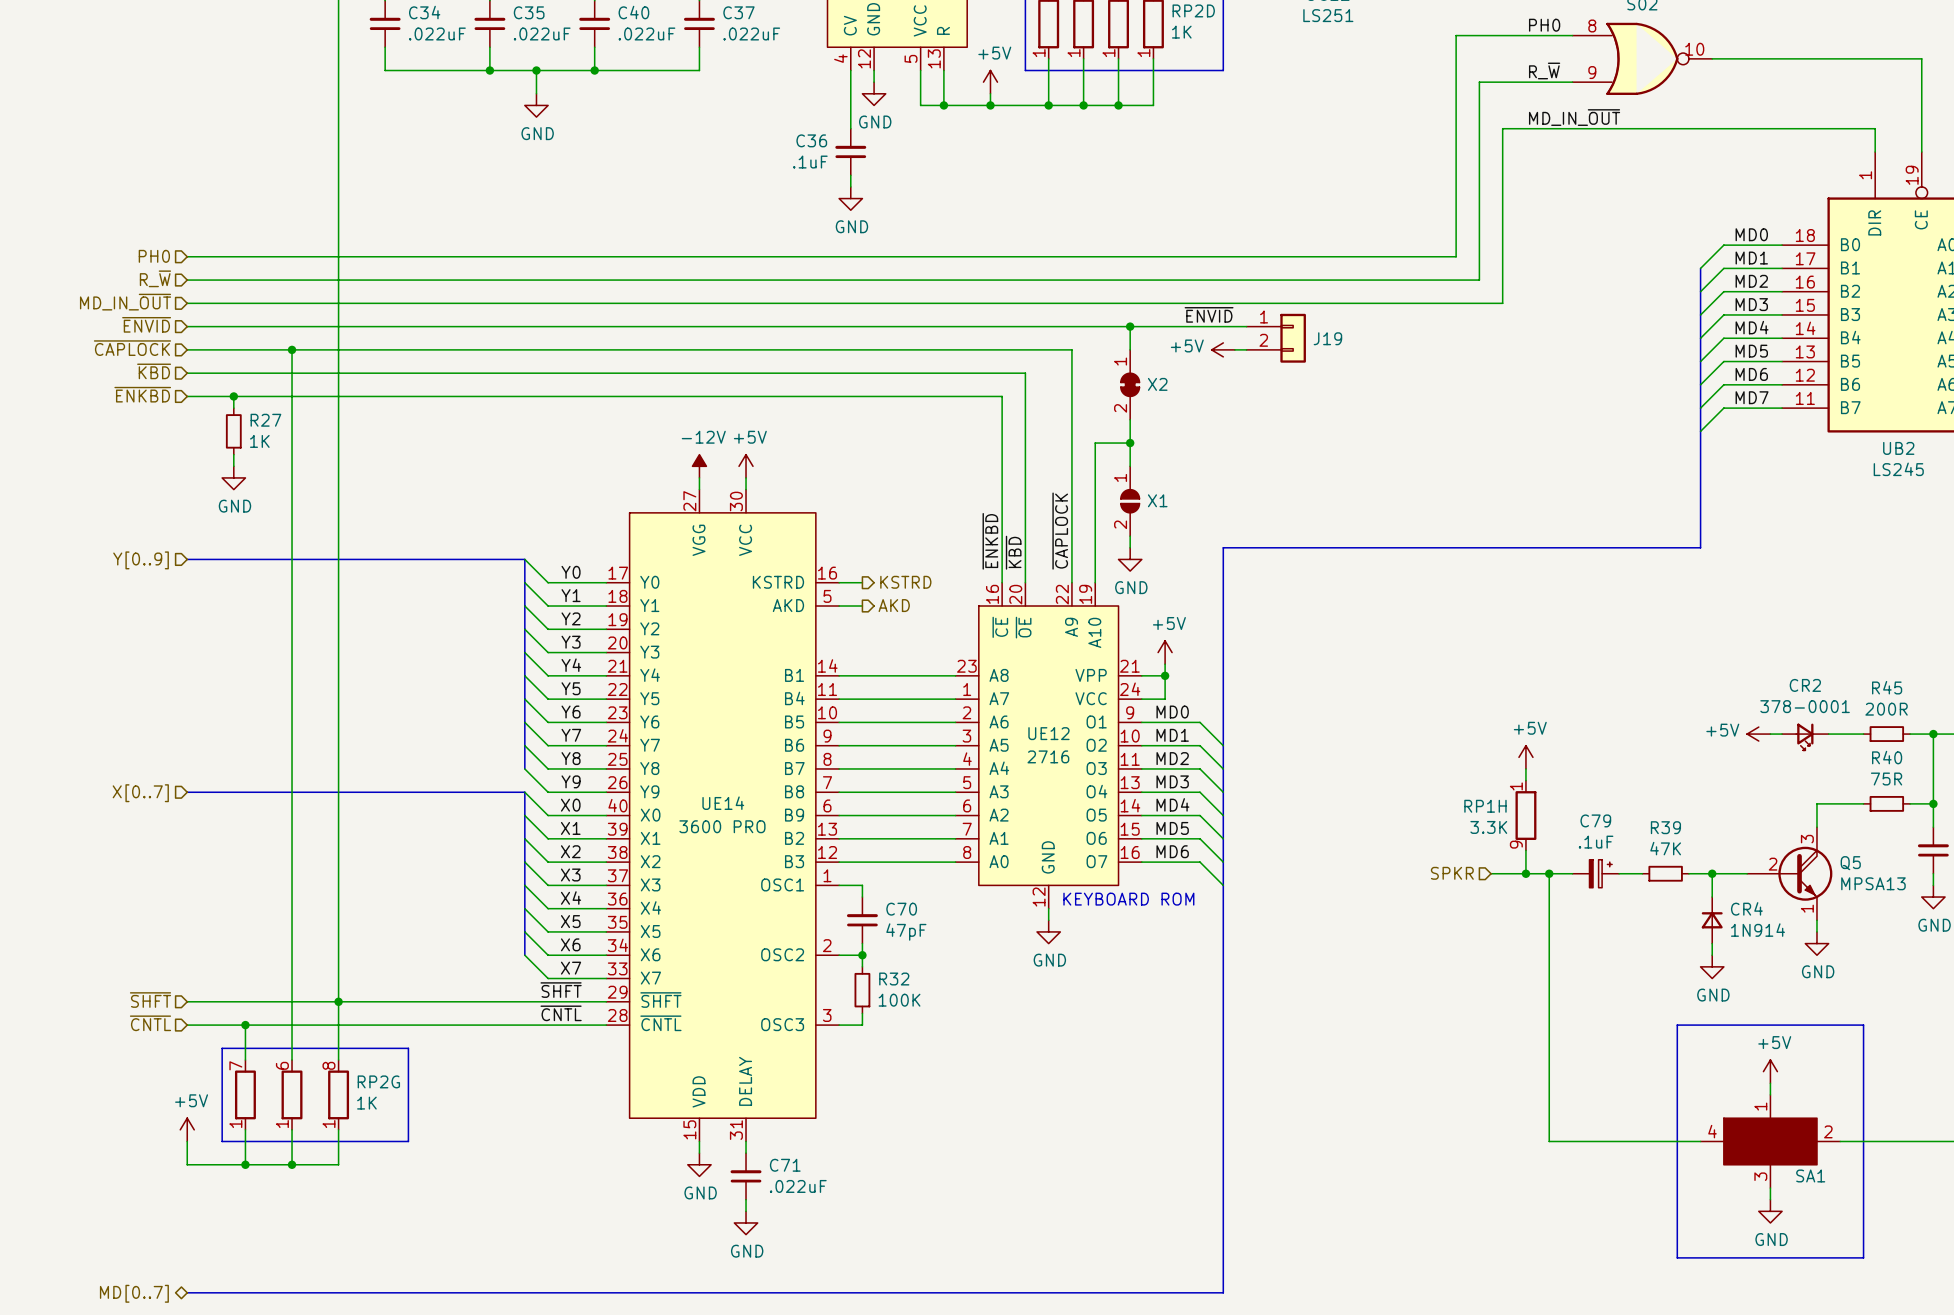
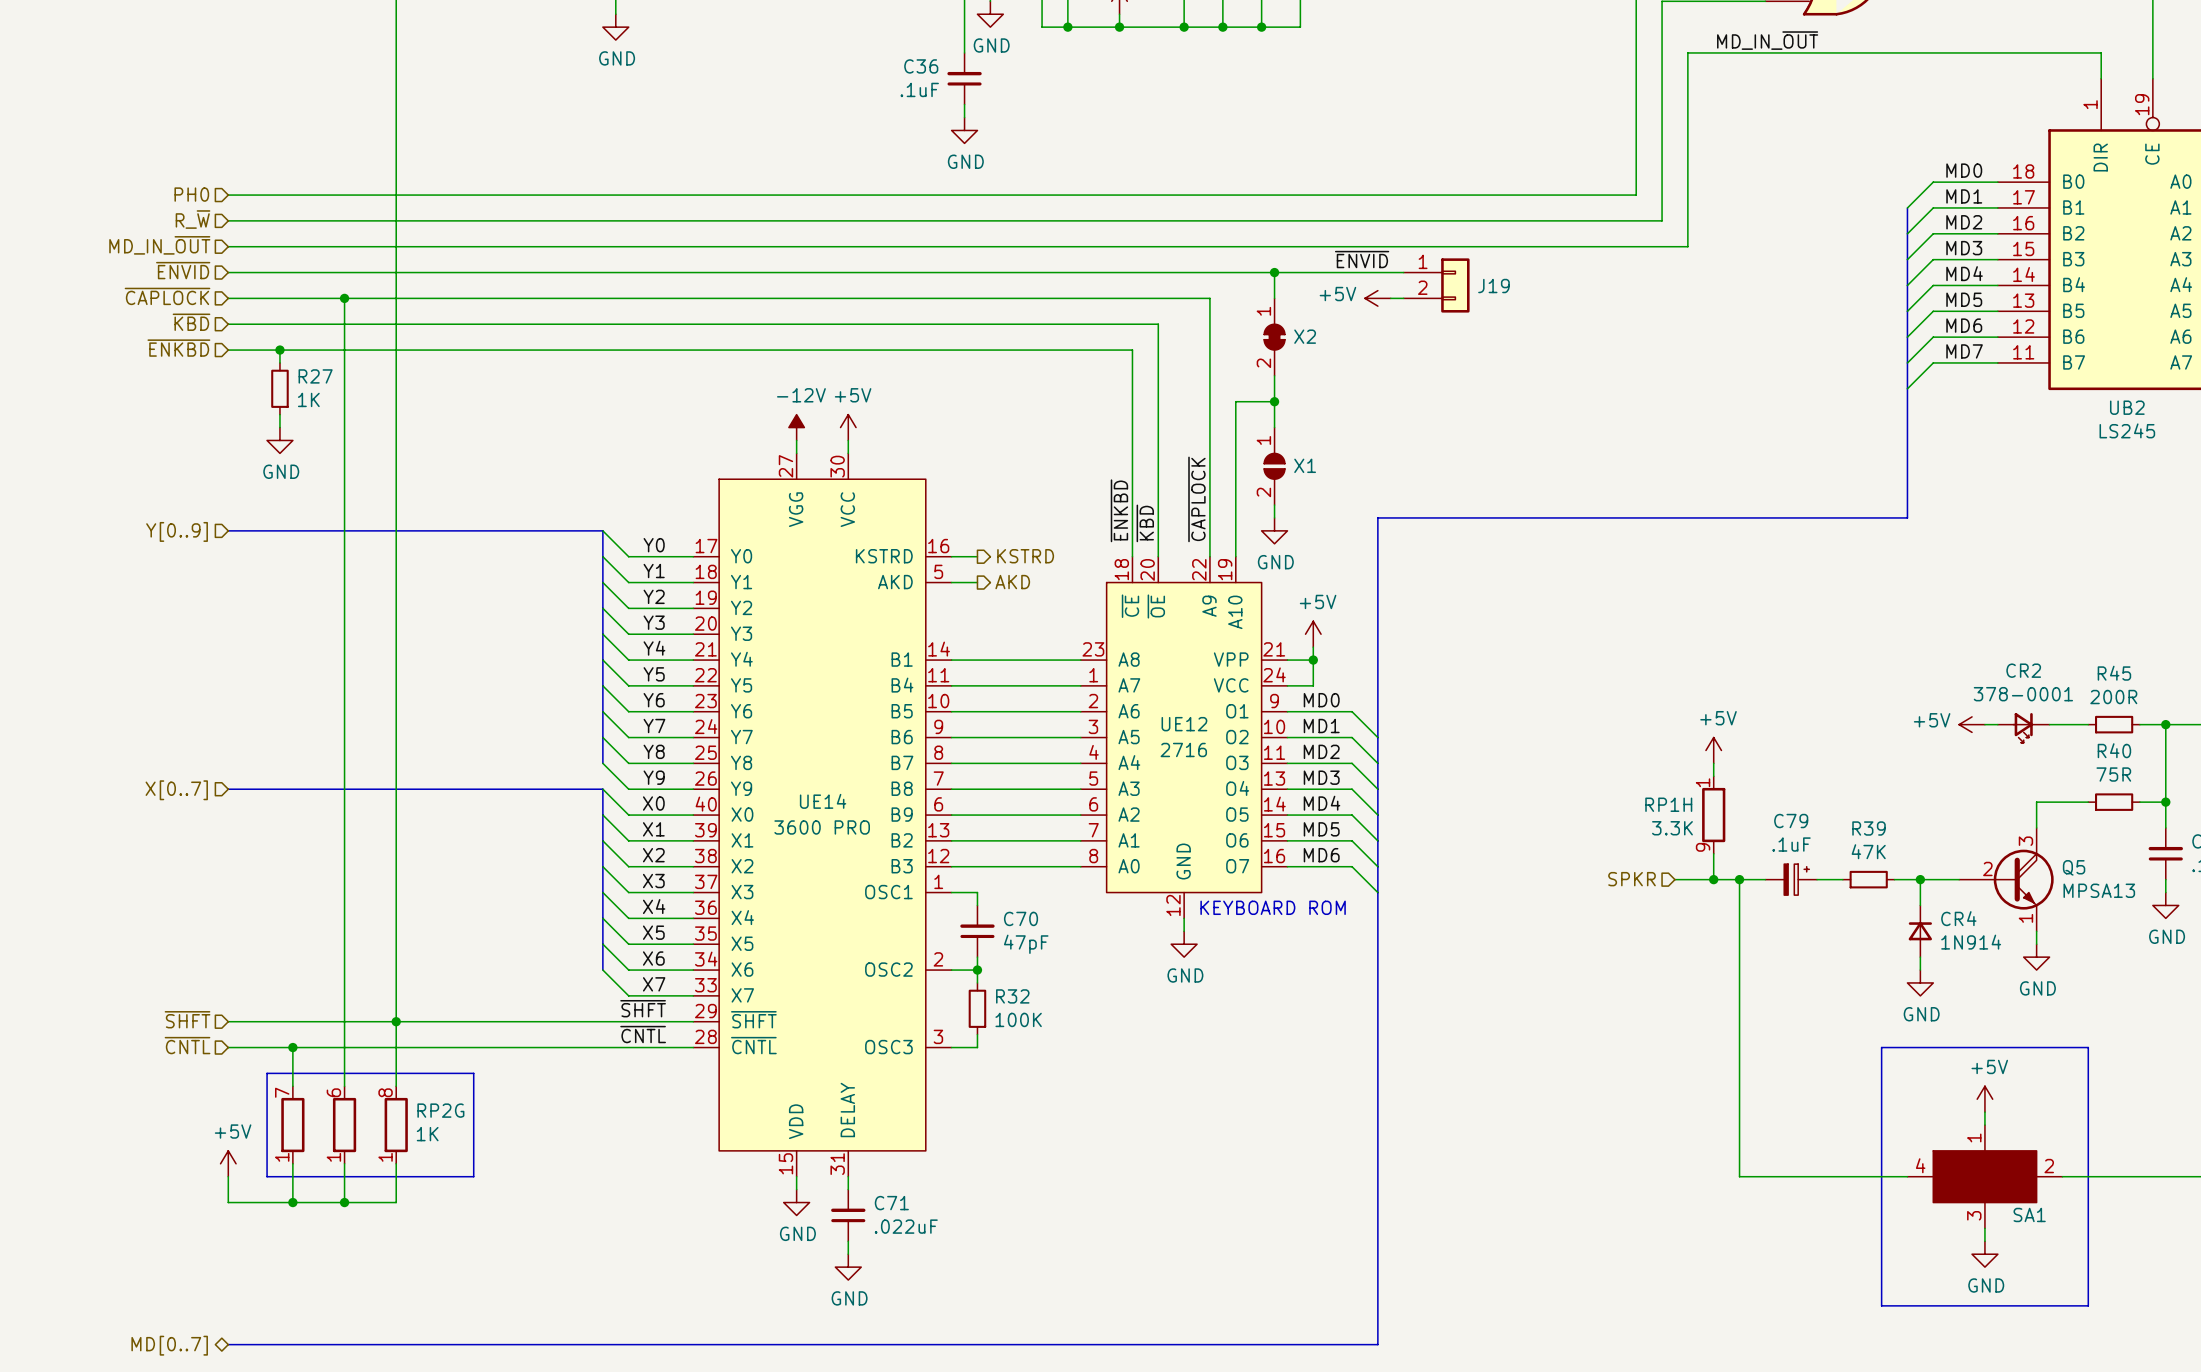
UE12 pin number: 16 (992, 594) -> 18 (1121, 569)

